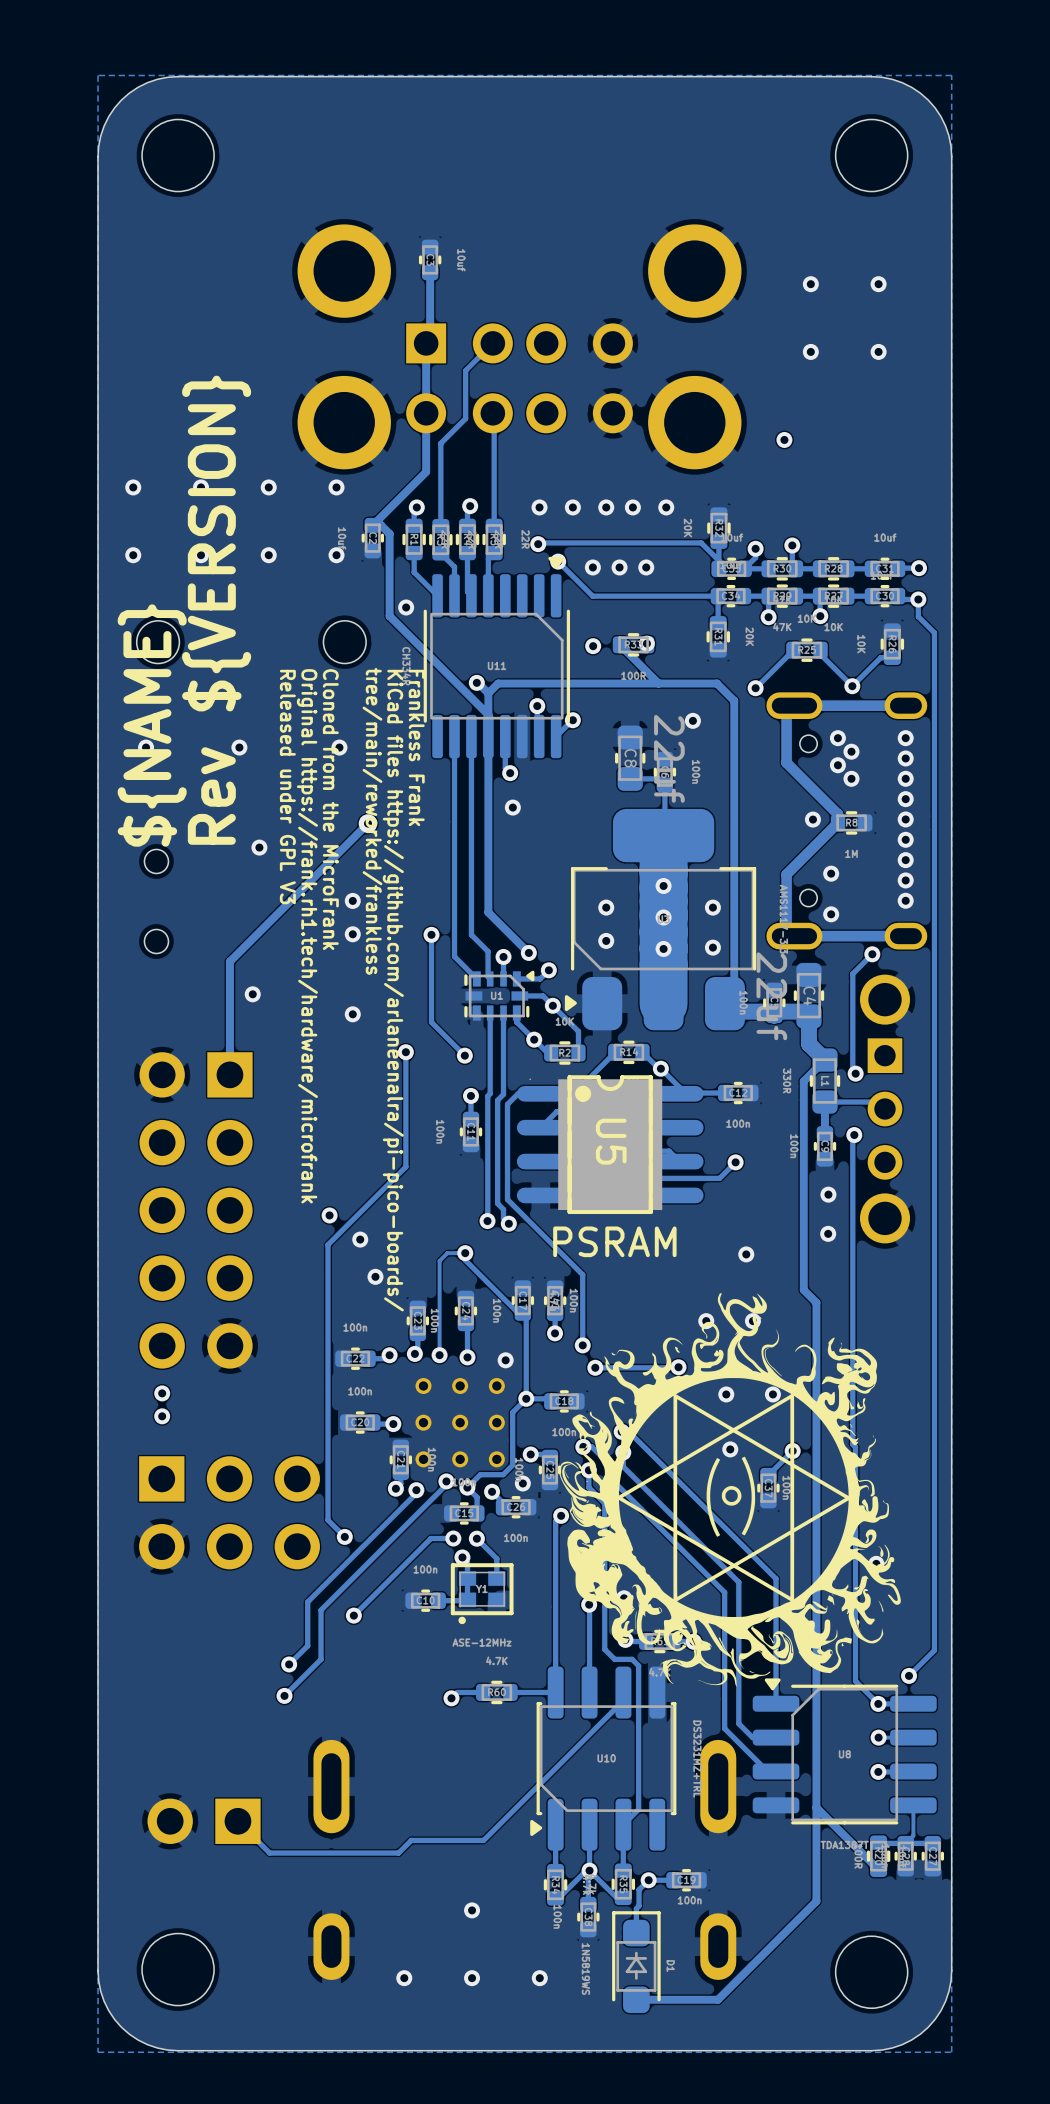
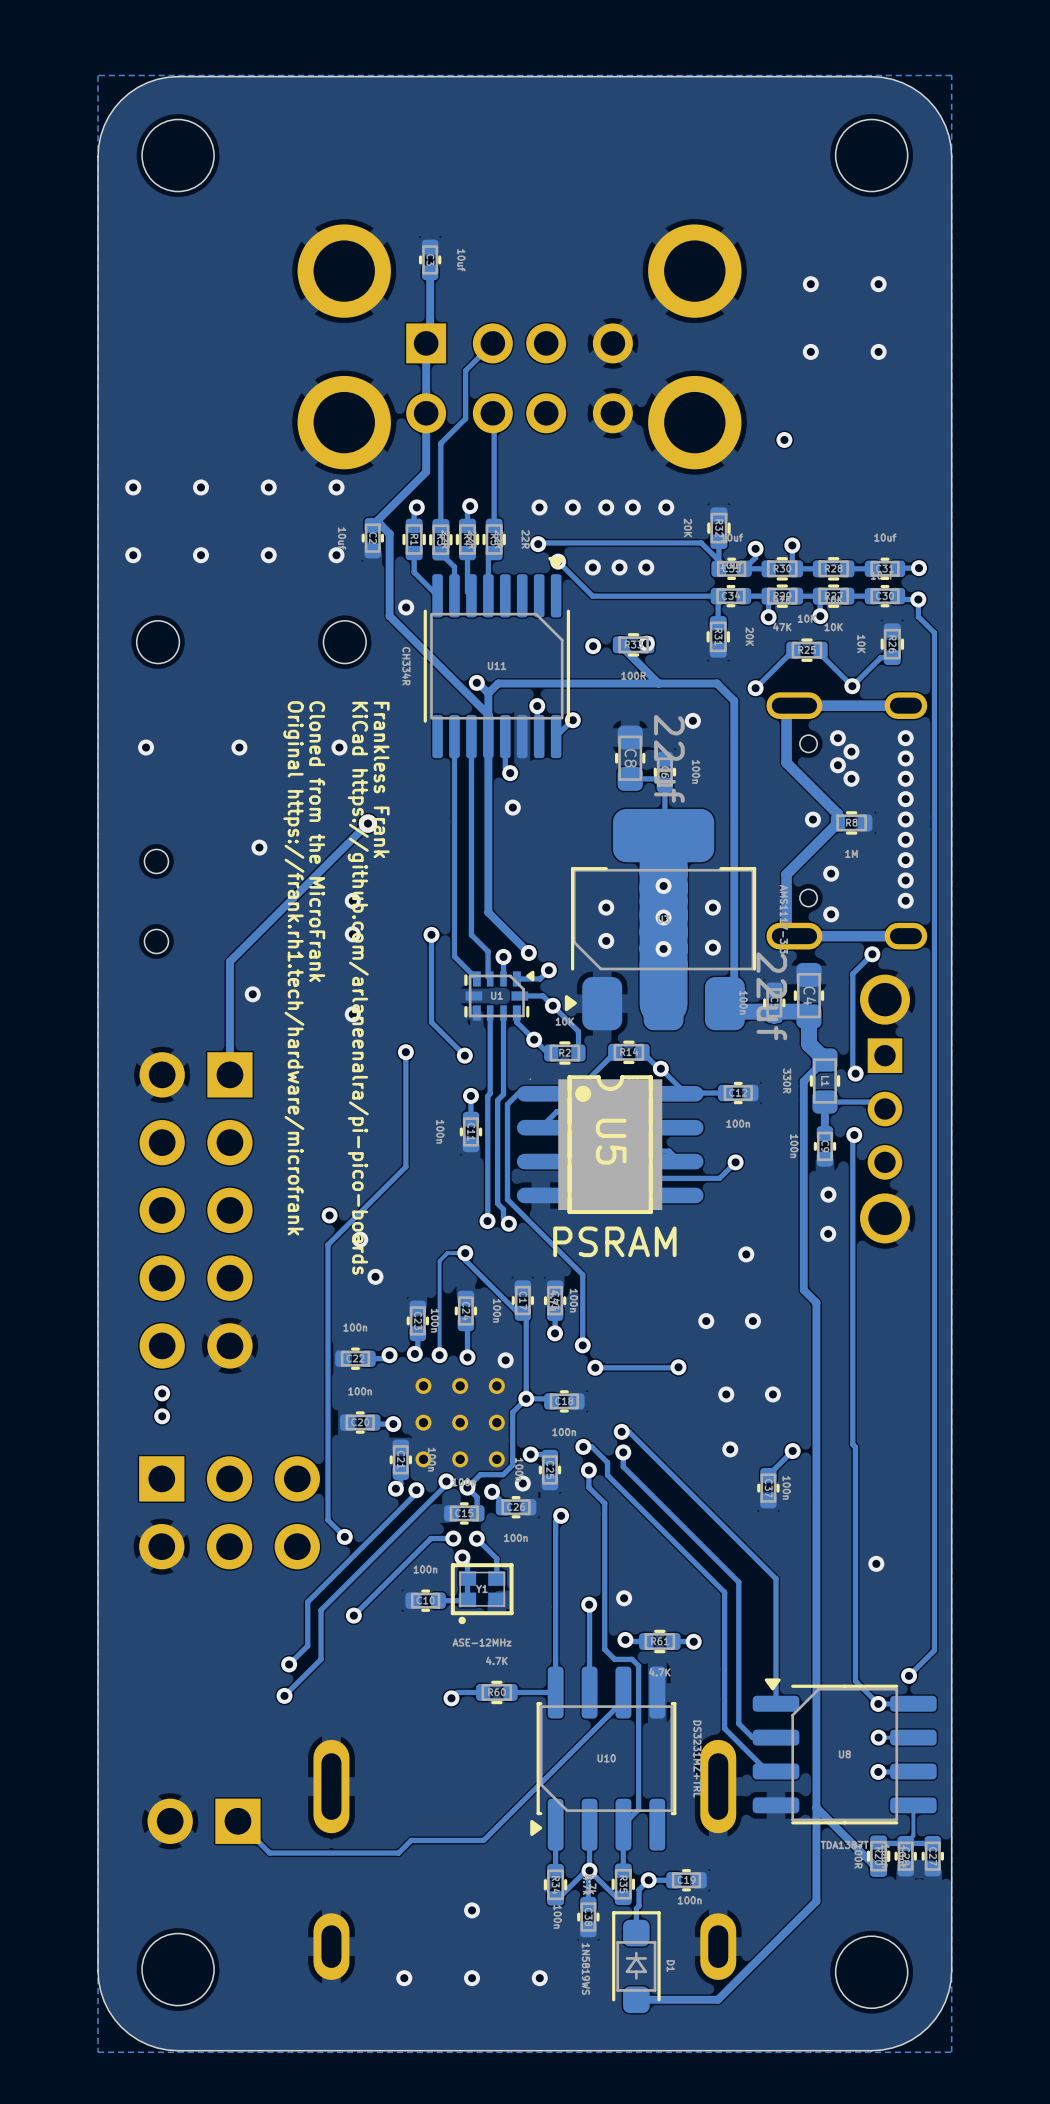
text: Rev ${VERSION} (216, 610) -> none
text: ${NAME} (152, 725) -> none
text position: Frankless Frank (416, 747) -> Frankless Frank (381, 779)
text: Released under GPL V3 (287, 787) -> none
text position: Cloned from the MicroFrank (330, 809) -> Cloned from the MicroFrank (317, 841)
text: tree/main/reworked/frankless (372, 821) -> none
text position: Original https://frank.rh1.tech/hardware/microfrank (307, 936) -> Original https://frank.rh1.tech/hardware/microfrank (293, 968)
text: none -> KiCad https://github.com/arlaneenalra/pi-pico-boards (358, 988)
text: KiCad files https://github.com/arlaneenalra/pi-pico-boards/ (393, 990) -> none
drawing: [559, 1293, 901, 1687] -> none

